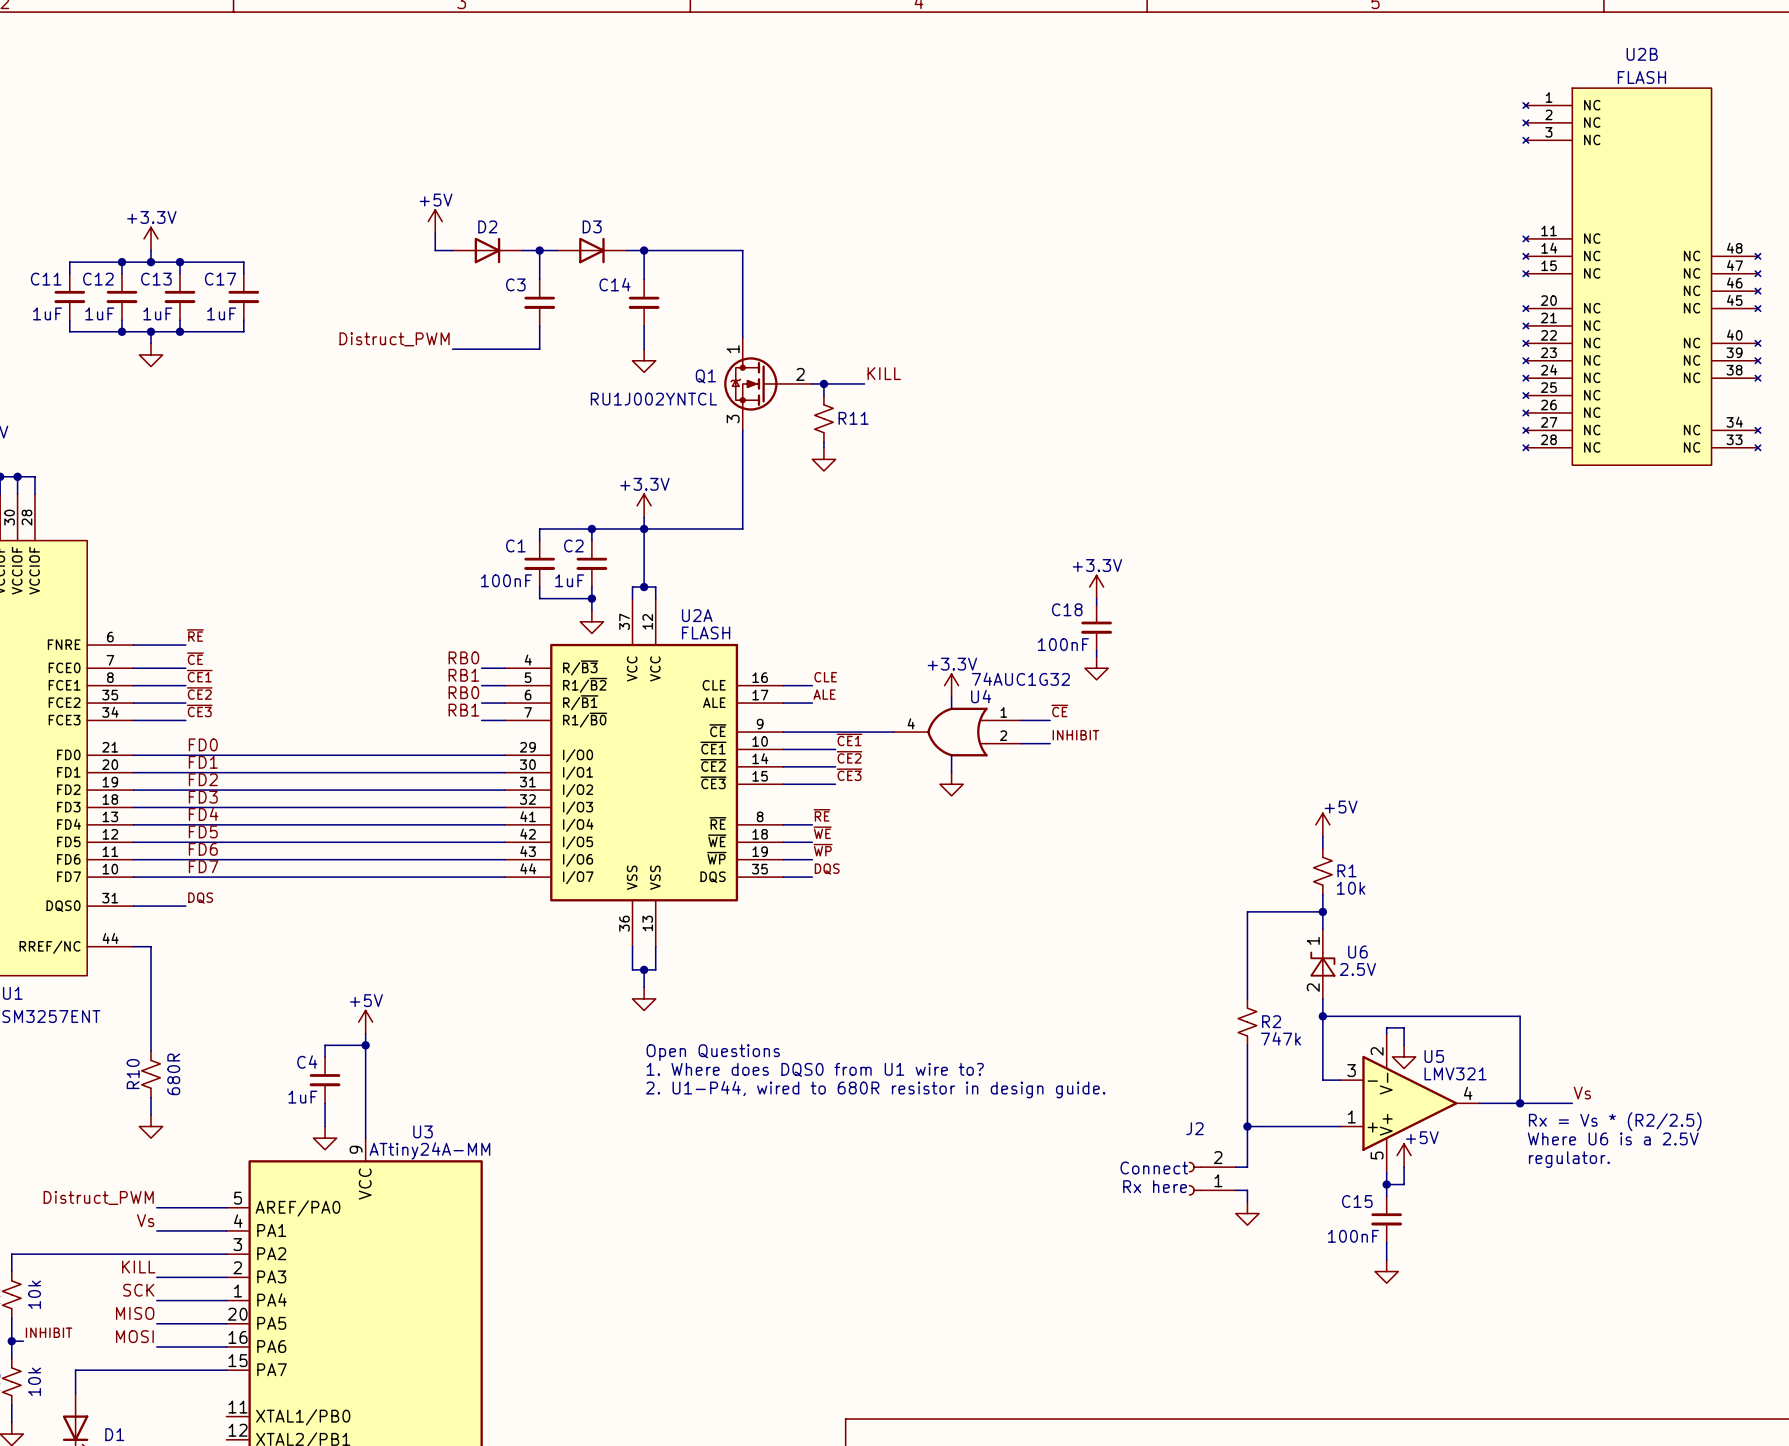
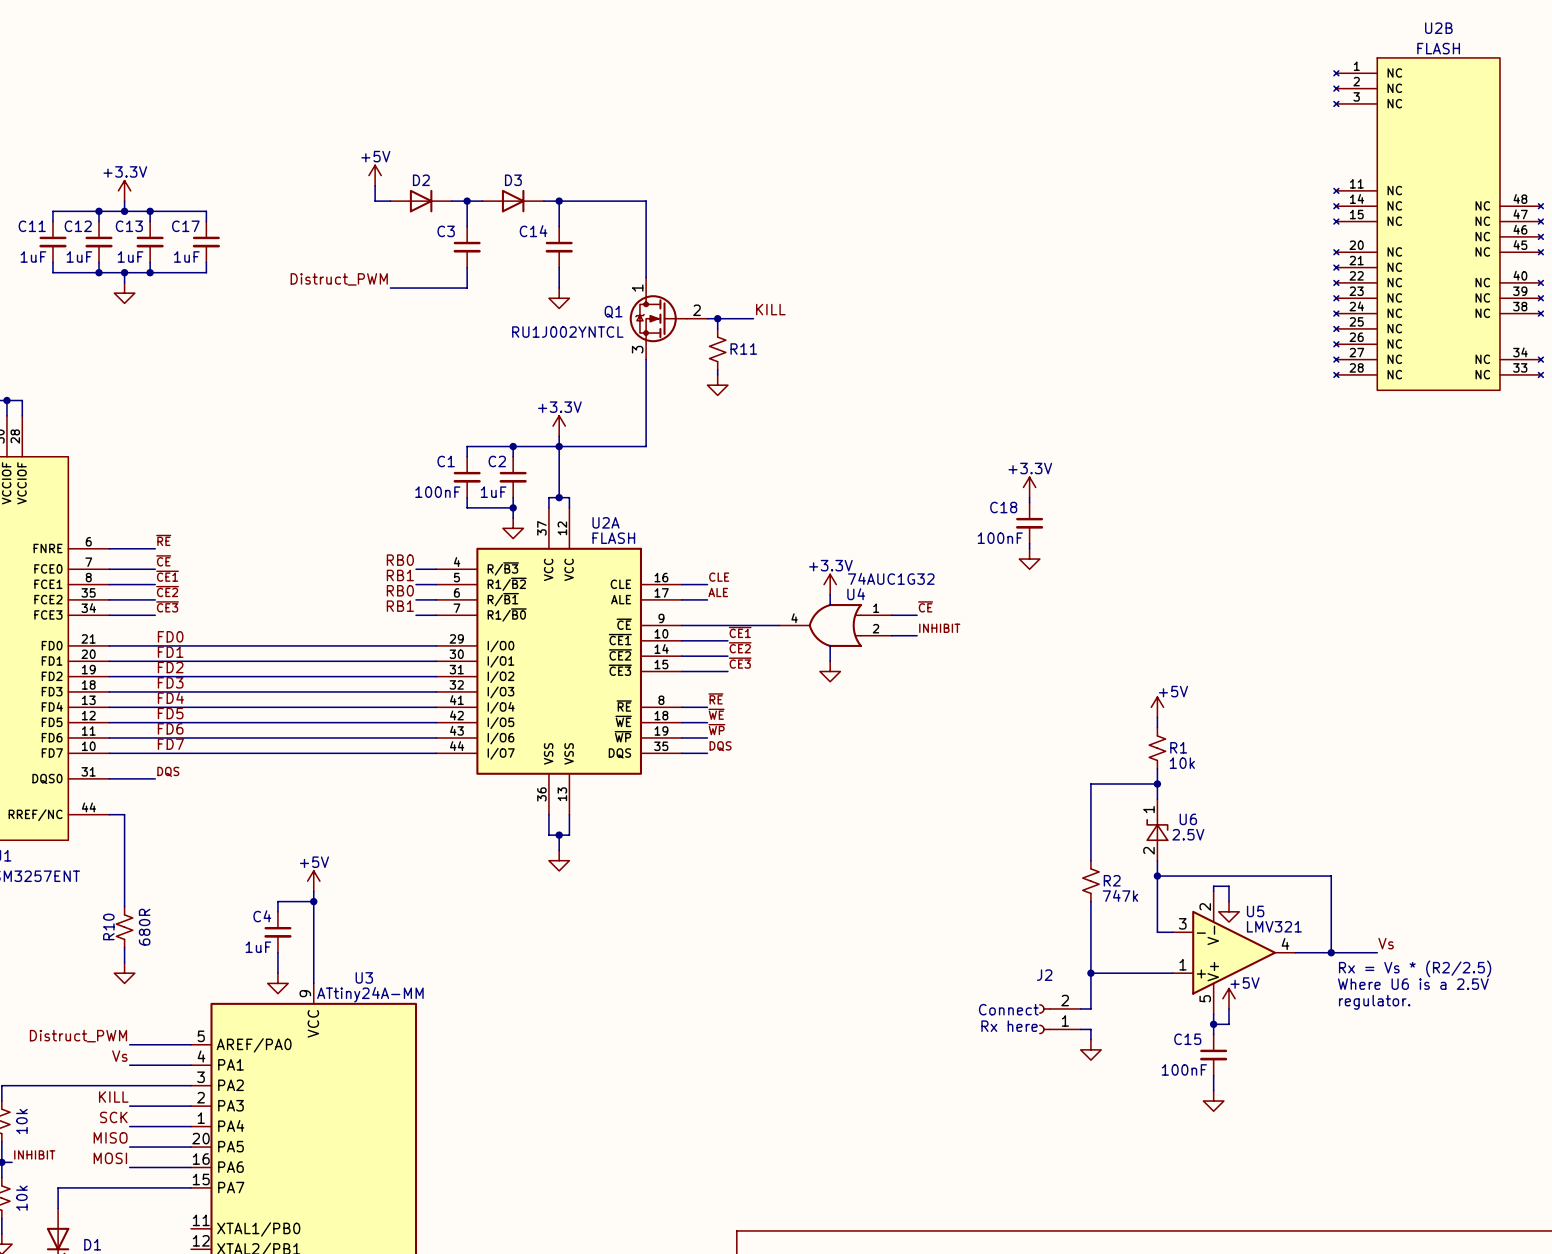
power symbol position: +3.3V (1096, 587) -> +3.3V (1029, 487)
wire: (1096, 598) (1096, 604) -> (1029, 497) (1029, 502)
C18 position: (1096, 627) -> (1029, 523)
wire: (1096, 650) (1096, 656) -> (1029, 543) (1029, 548)
power symbol position: (1096, 668) -> (1029, 559)
text: Open Questions (713, 1052) -> none
text: 1. Where does DQS0 from U1 wire to? (815, 1069) -> none
text: 2. U1-P44, wired to 680R resistor in design guide. (875, 1089) -> none

